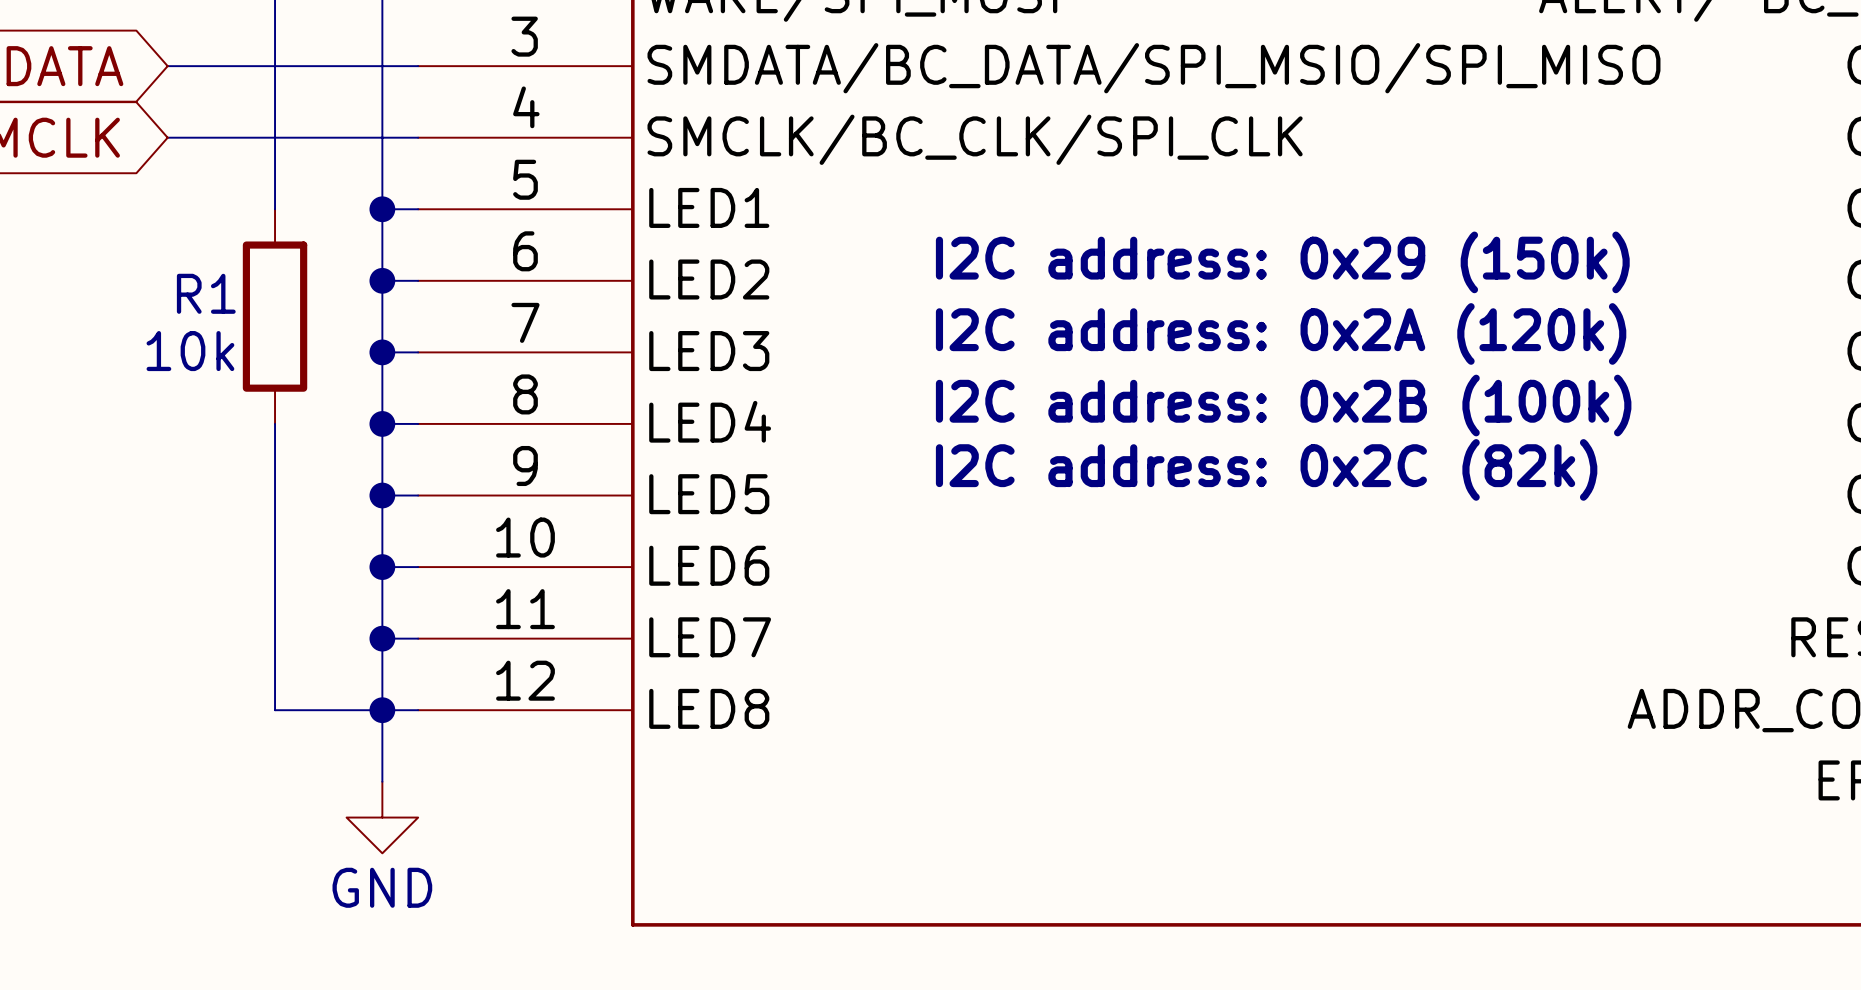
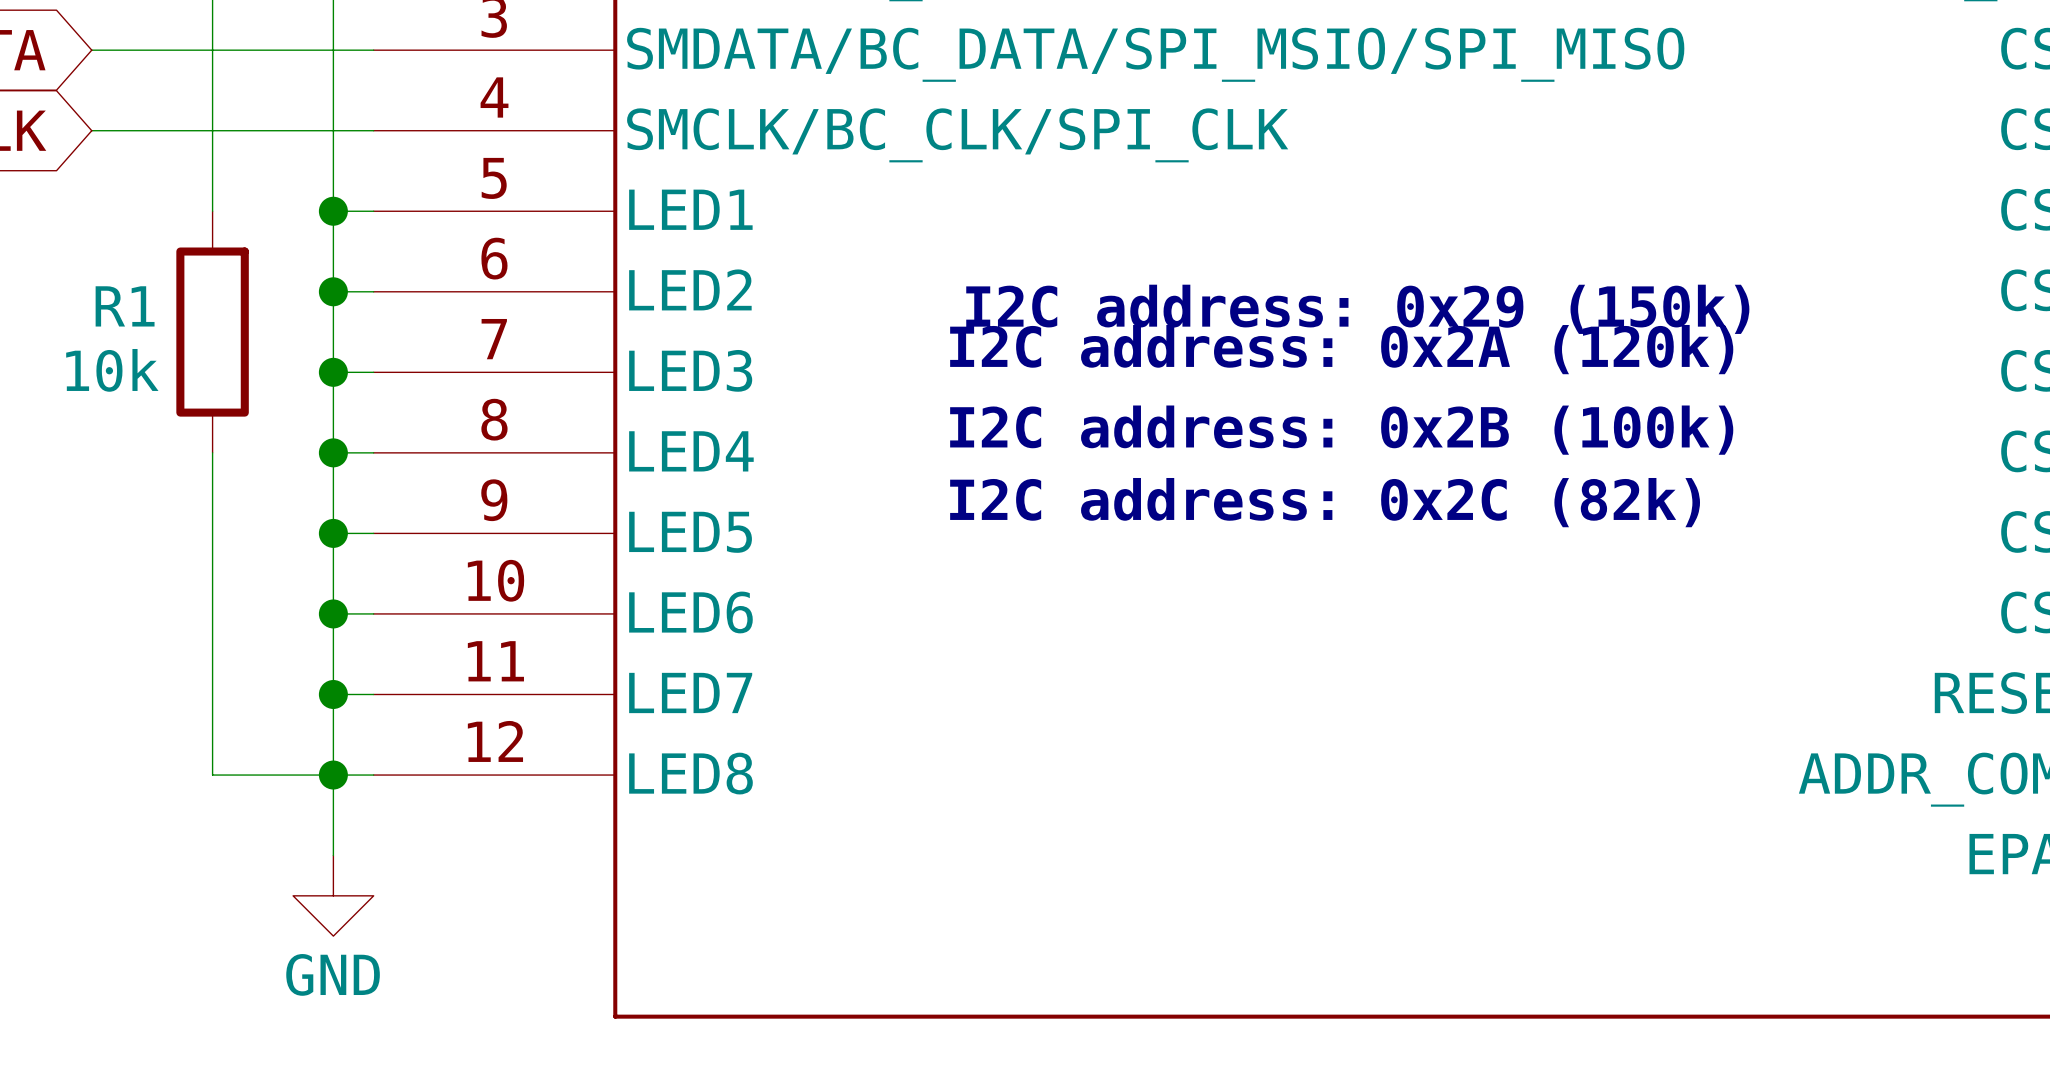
text position: I2C address: 0x29 (150k) (1282, 262) -> I2C address: 0x29 (150k) (1357, 309)

